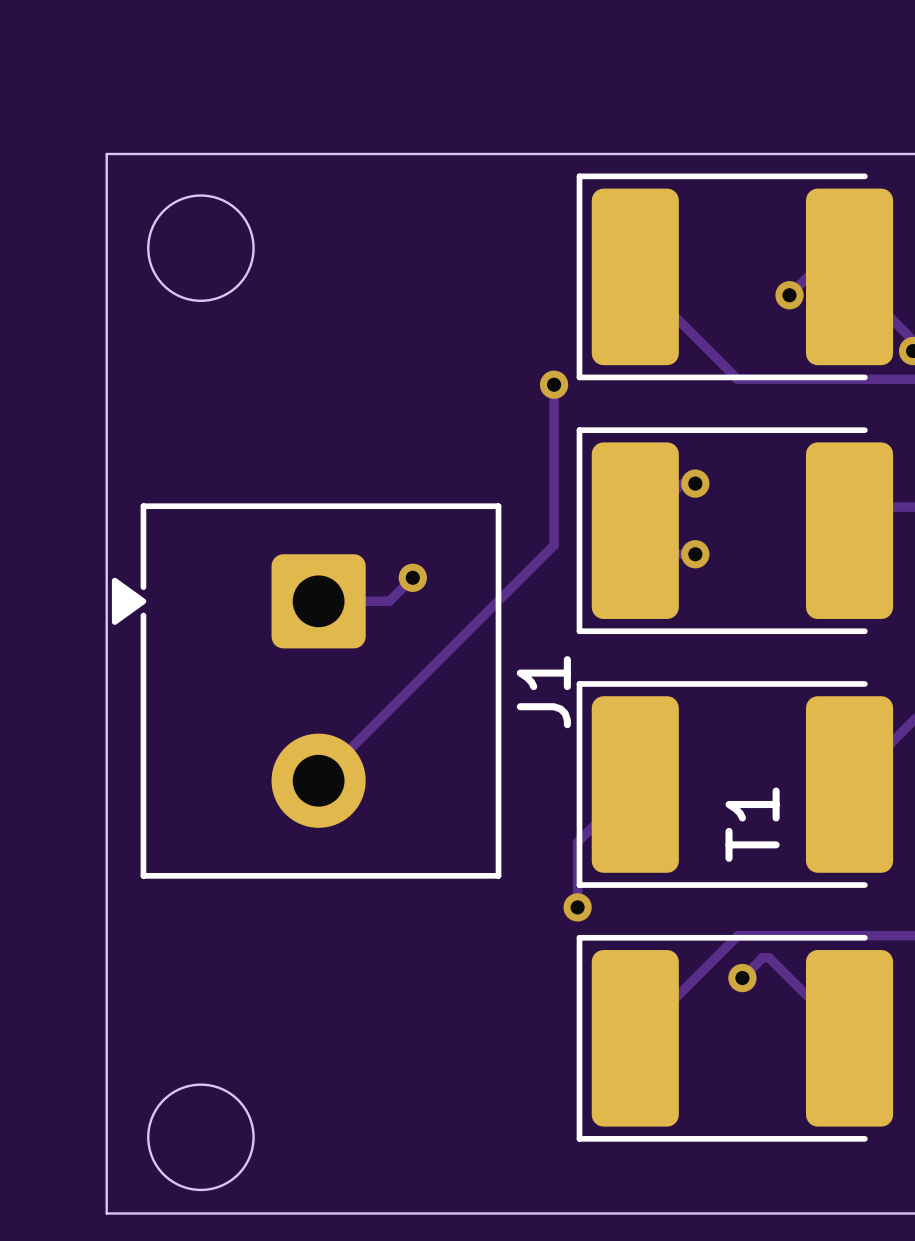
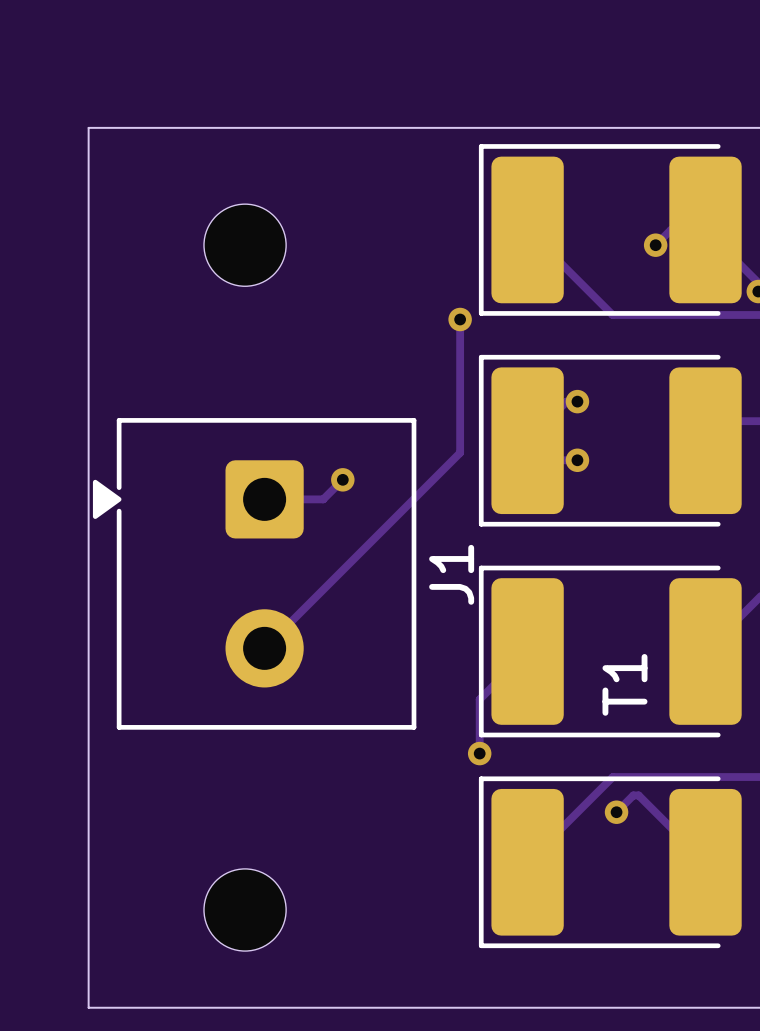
round board edge: [147, 194, 255, 302] -> none
part: none -> (245, 245)
round board edge: [147, 1083, 255, 1192] -> none
part: none -> (245, 909)

